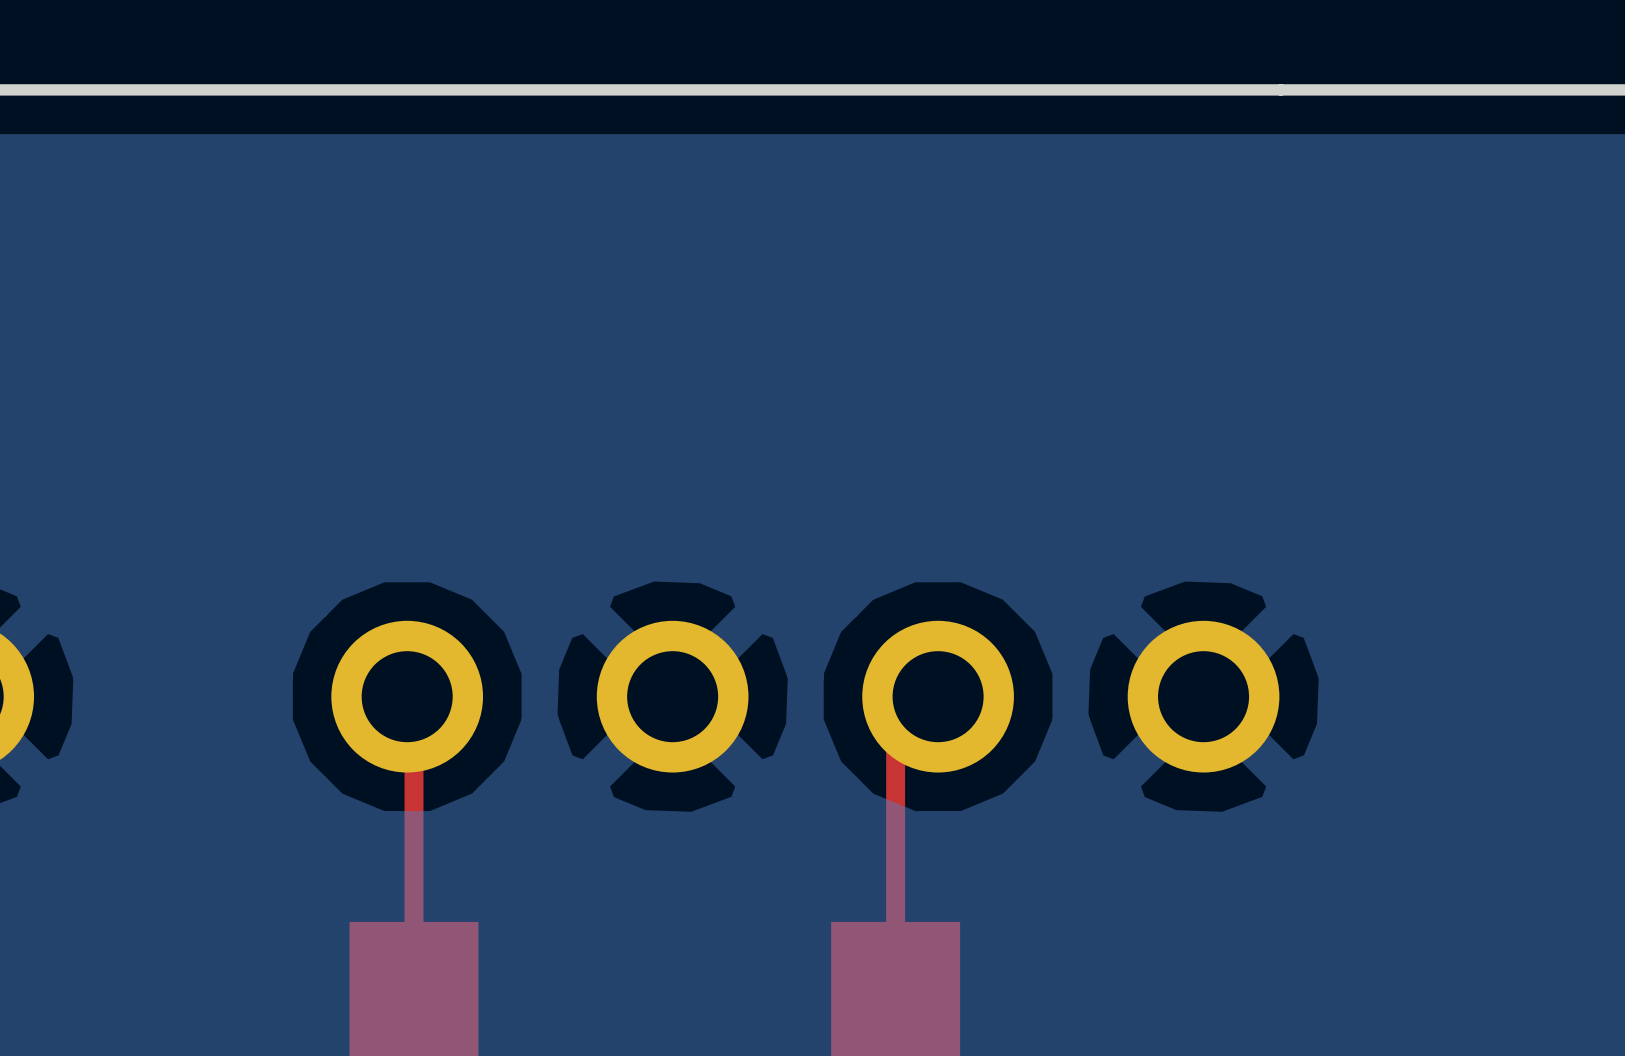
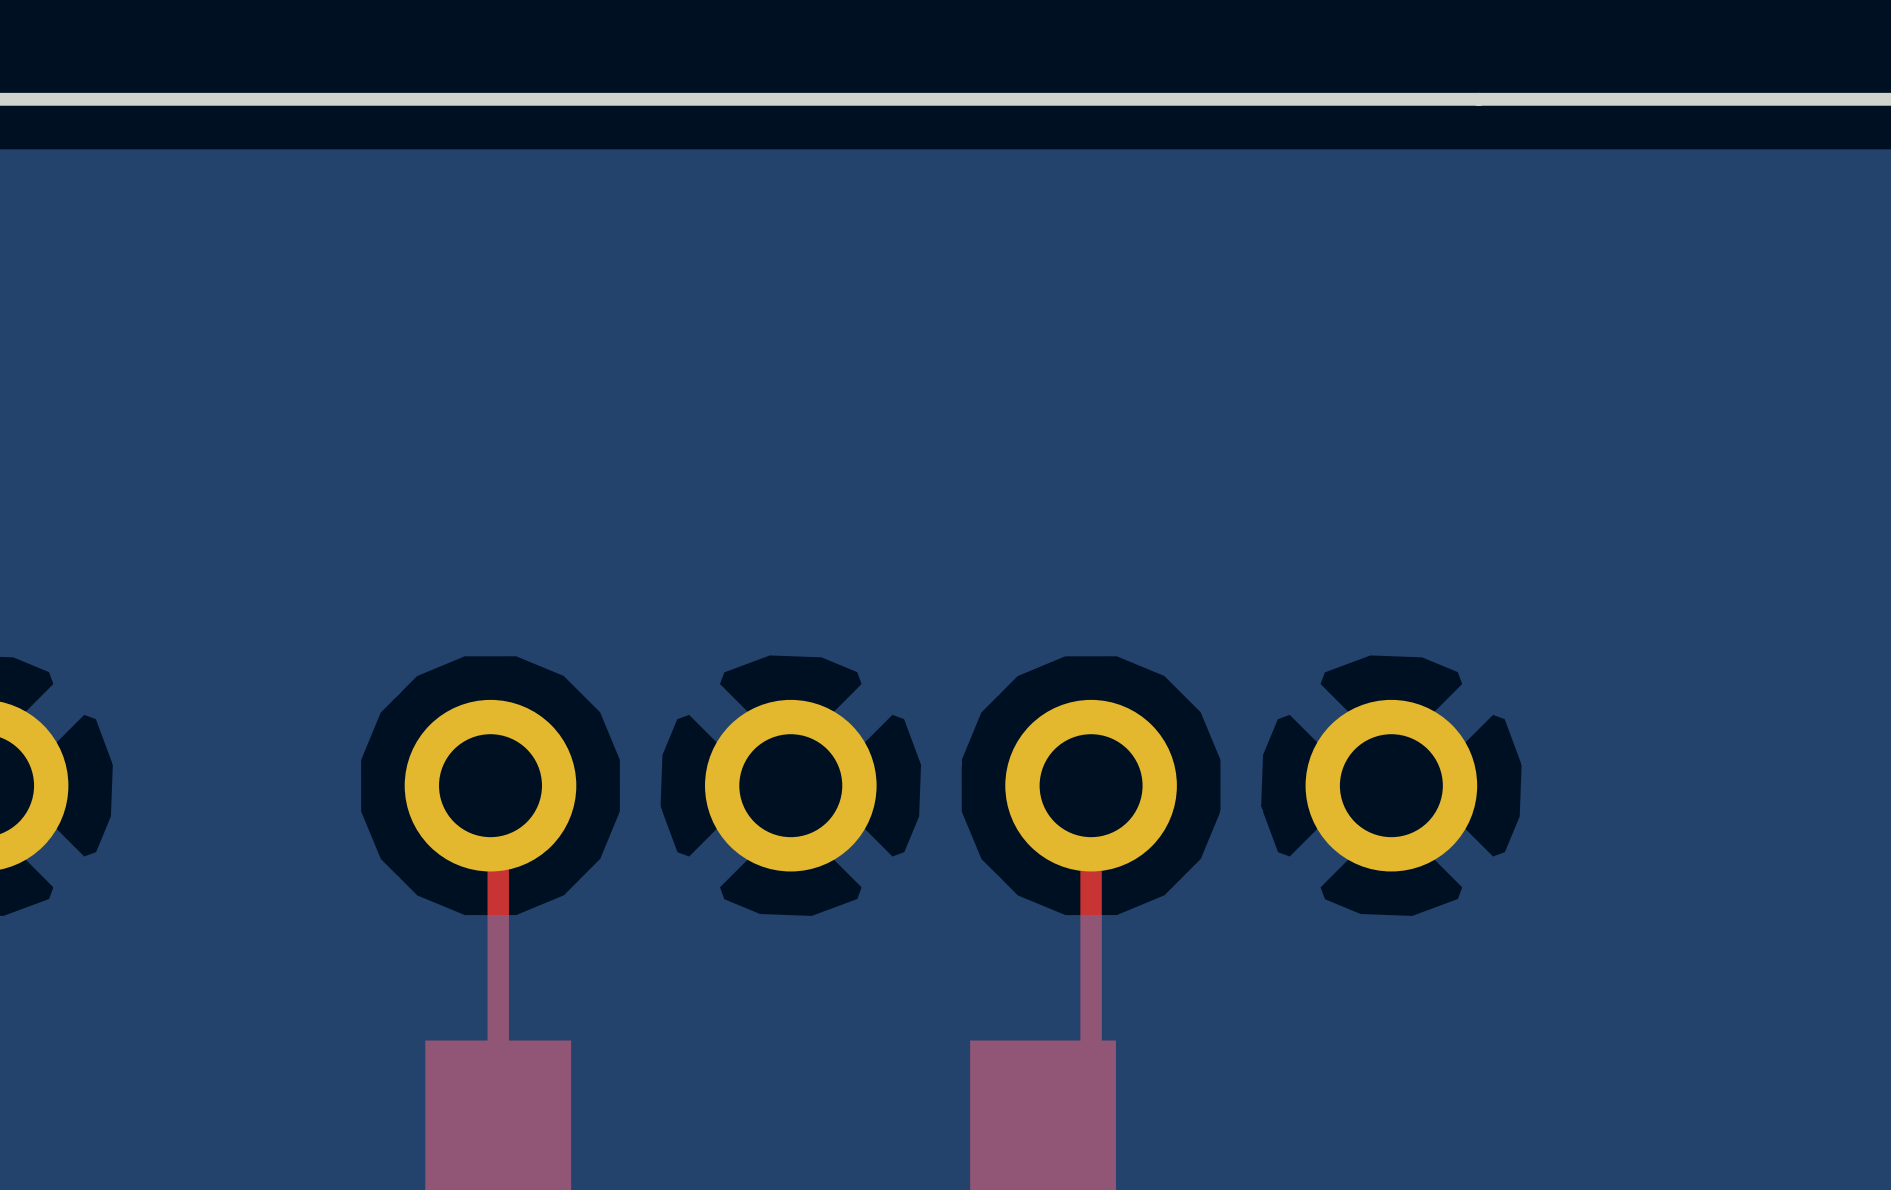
top track: (938, 696) (895, 739) (895, 997) -> (1091, 785) (1091, 1078) (1043, 1126)

